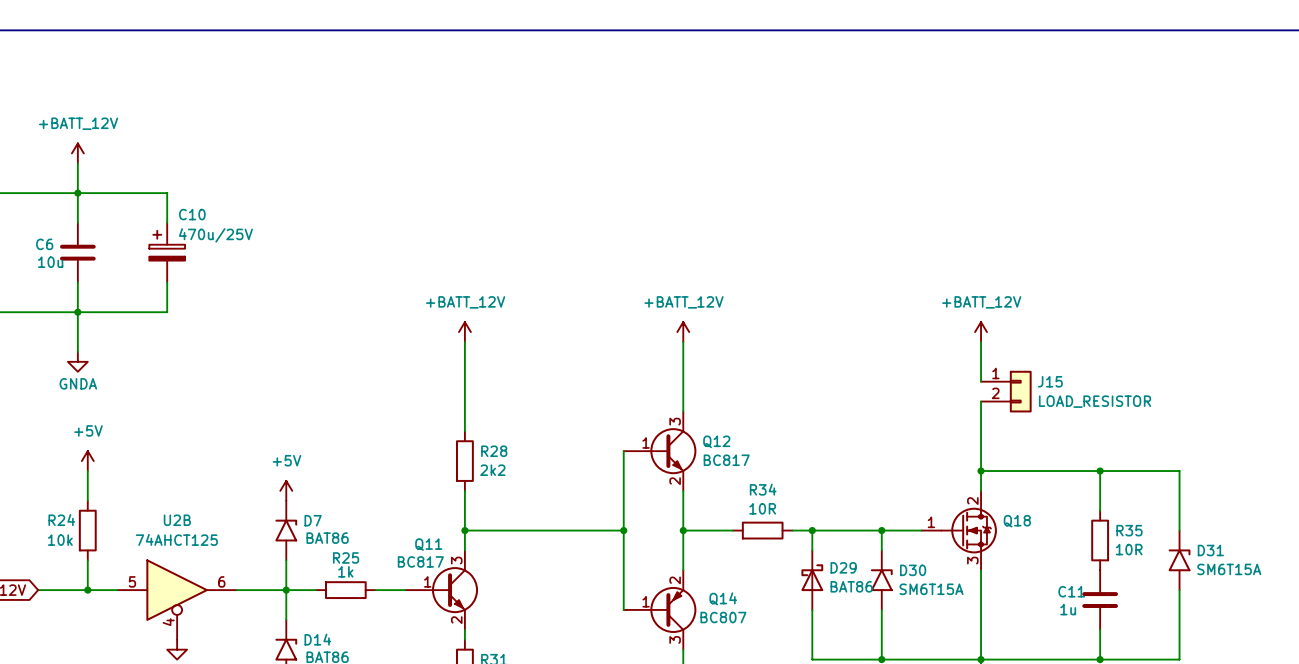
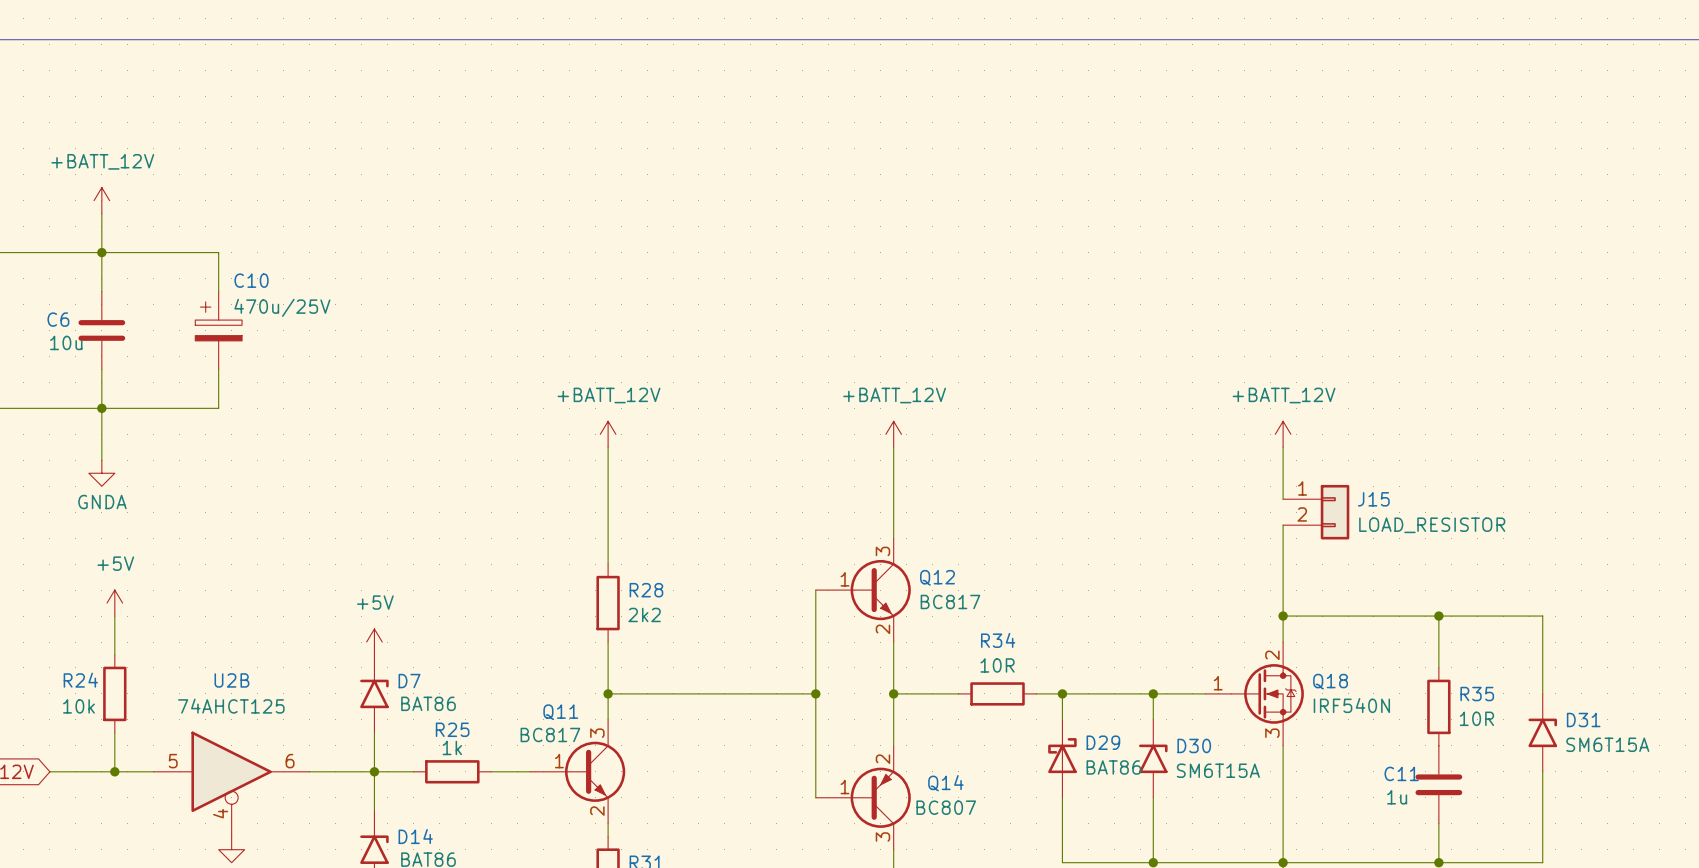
Q18 value: none -> IRF540N (1351, 705)

